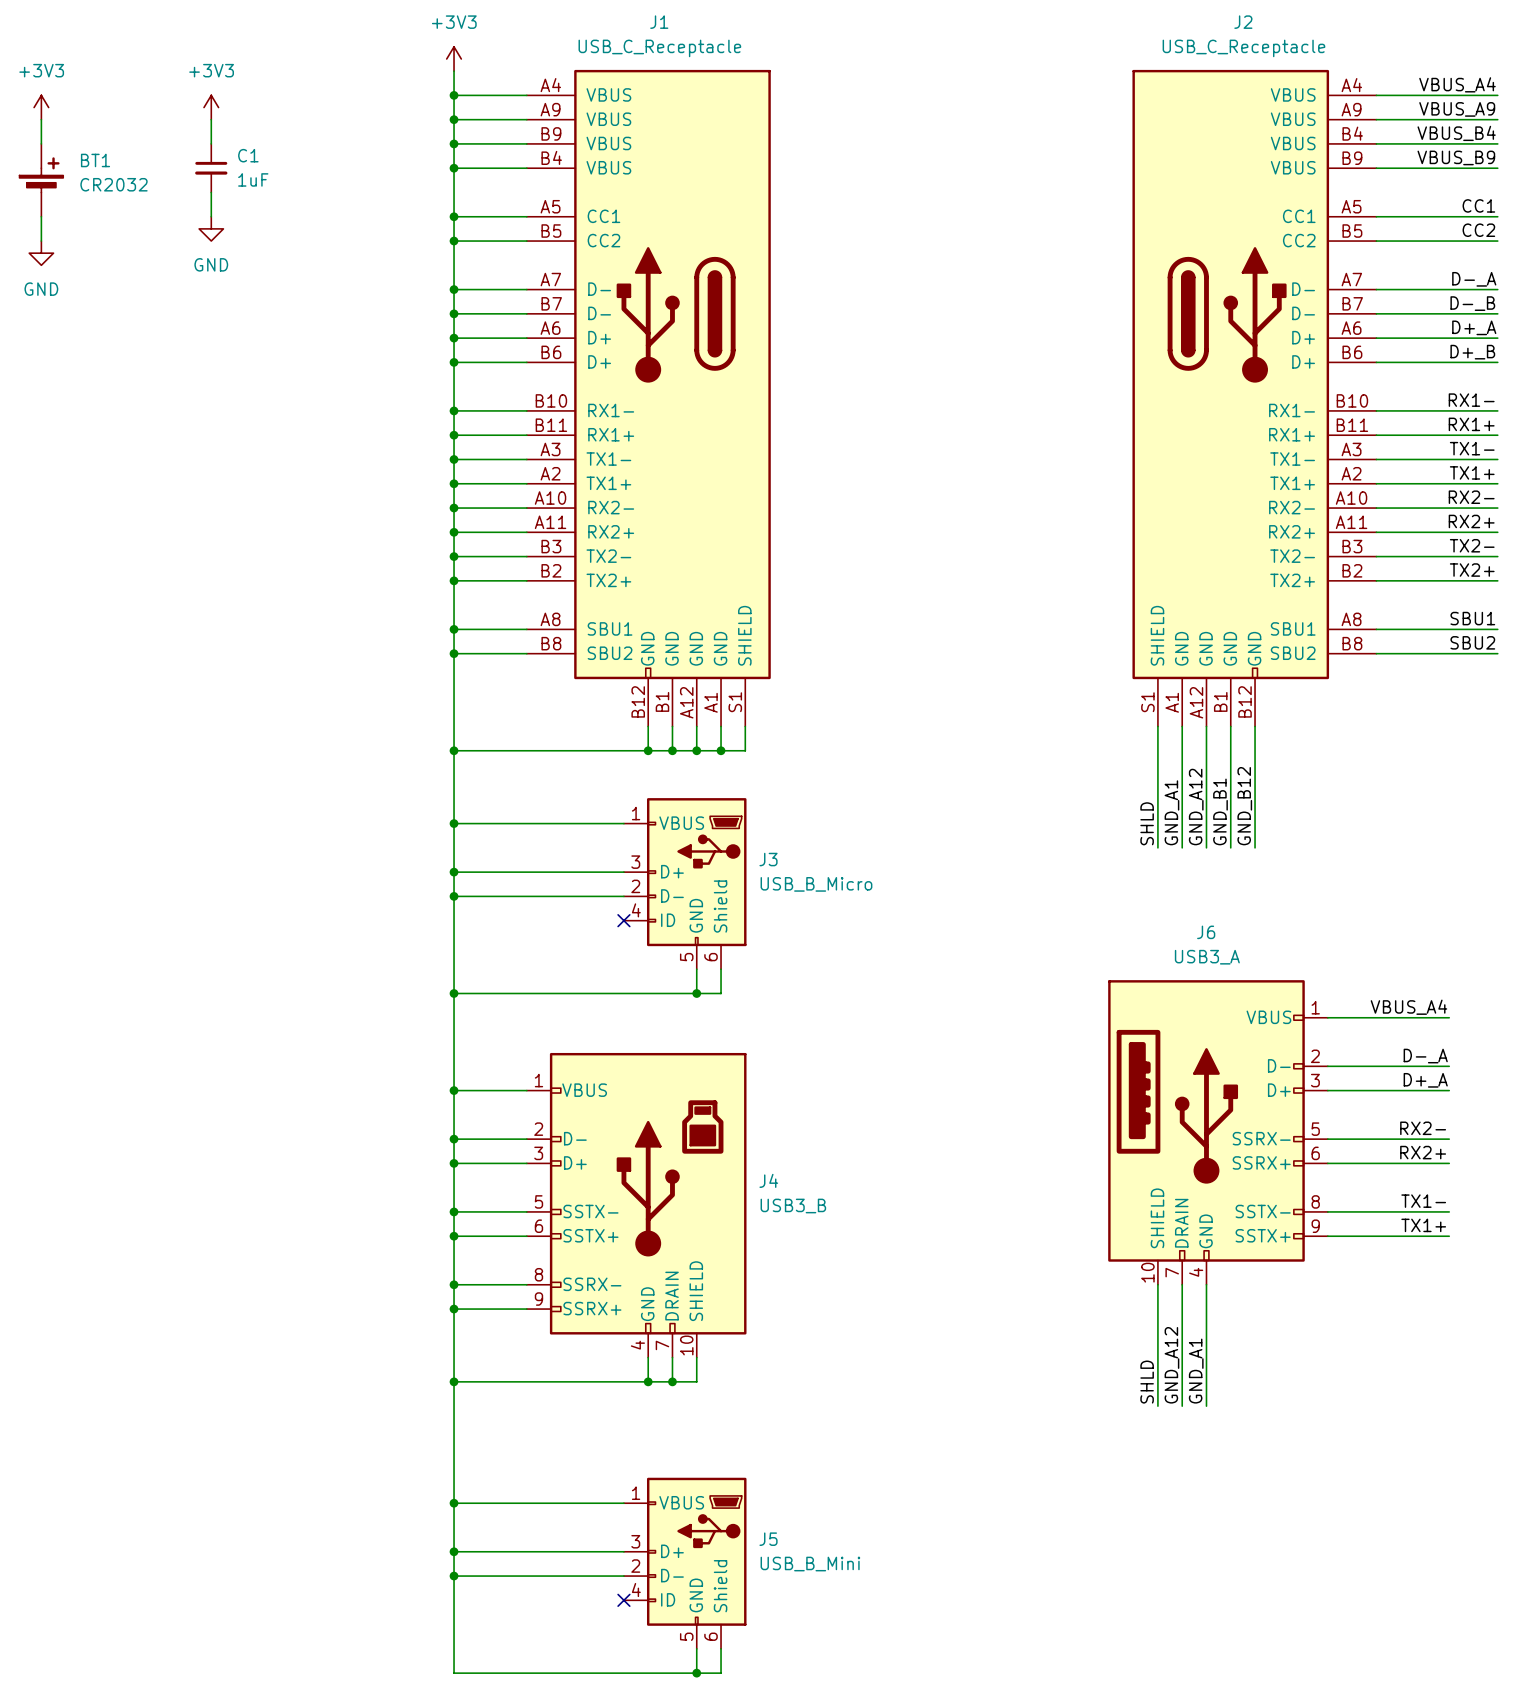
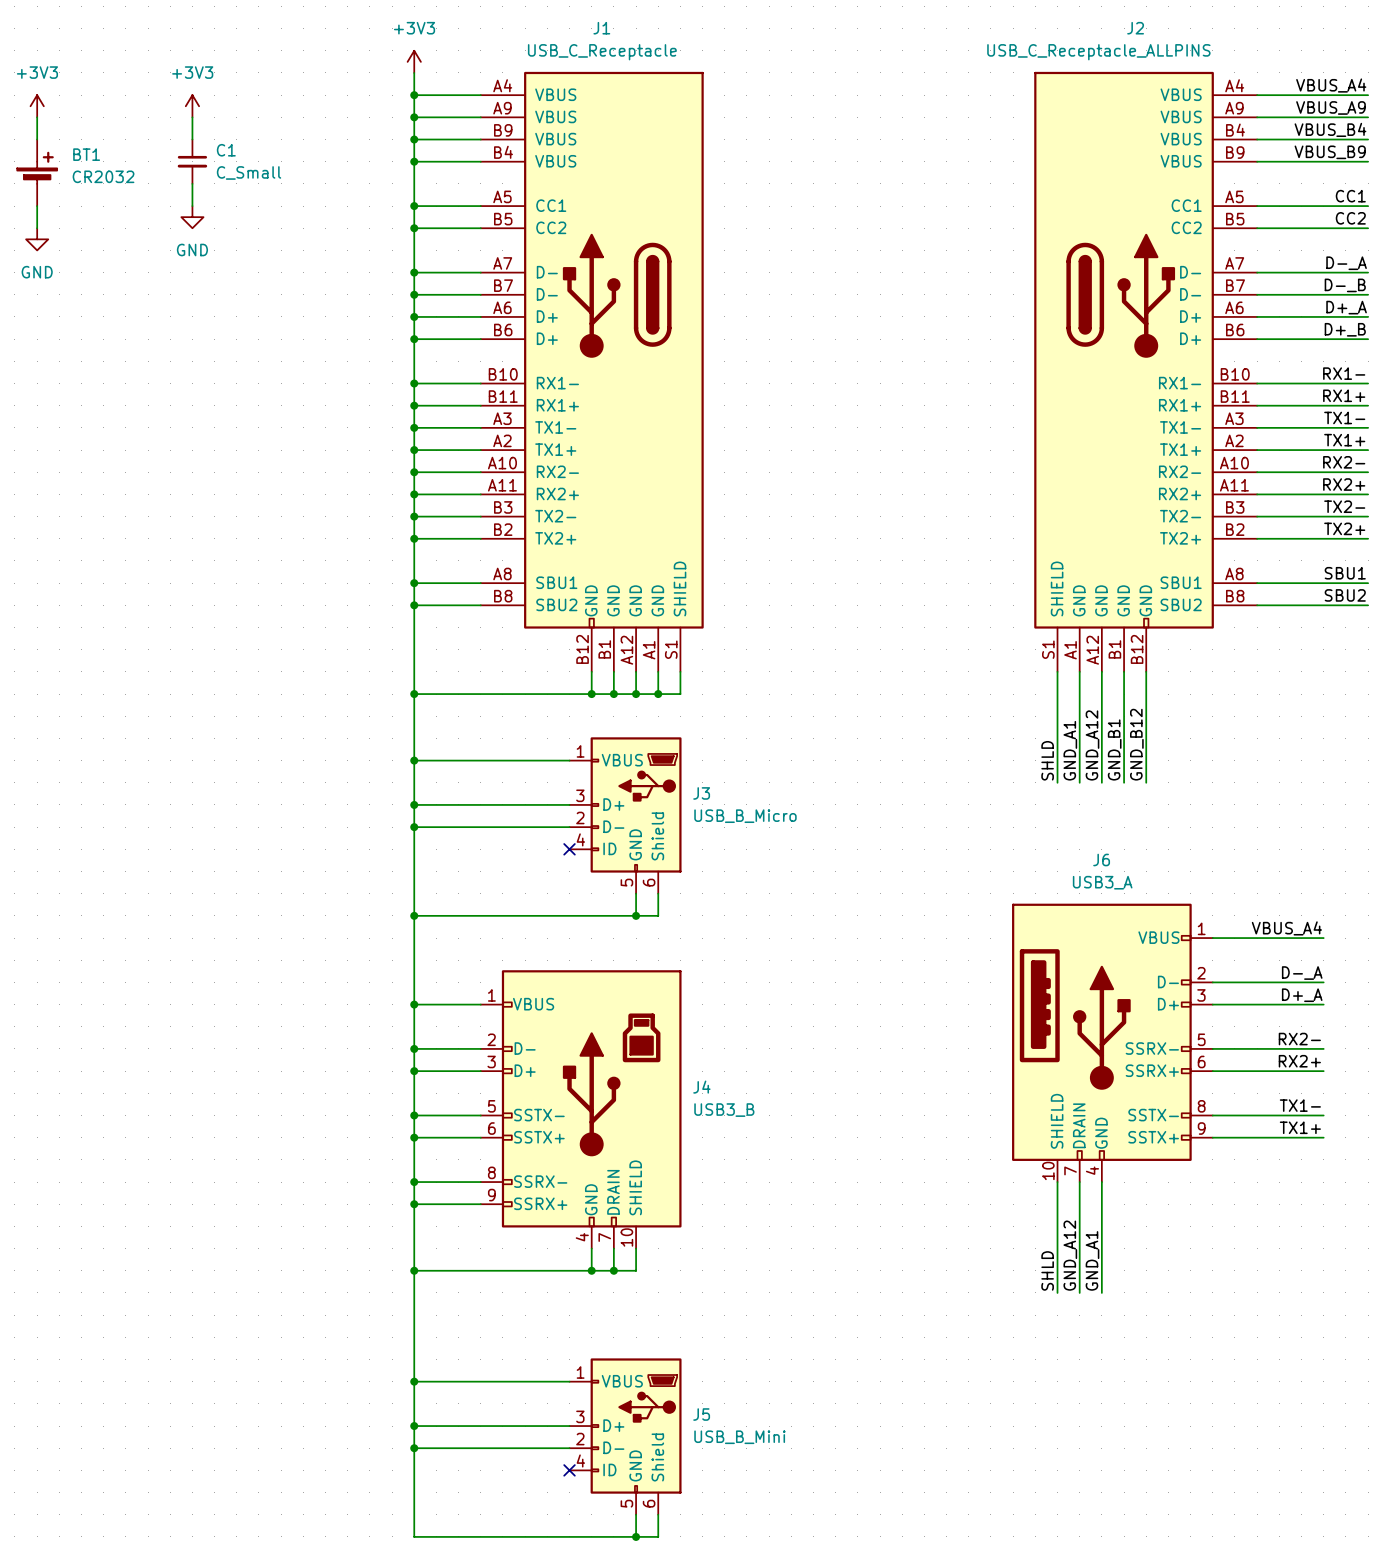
J2 value: USB_C_Receptacle (1243, 48) -> USB_C_Receptacle_ALLPINS (1098, 52)
C1 value: 1uF (253, 179) -> C_Small (249, 172)

